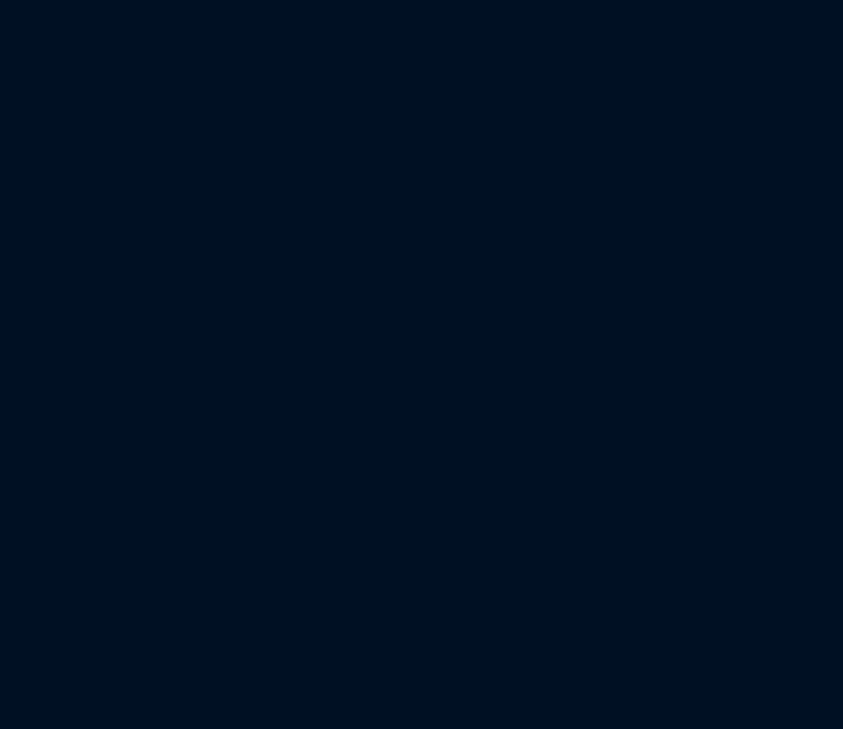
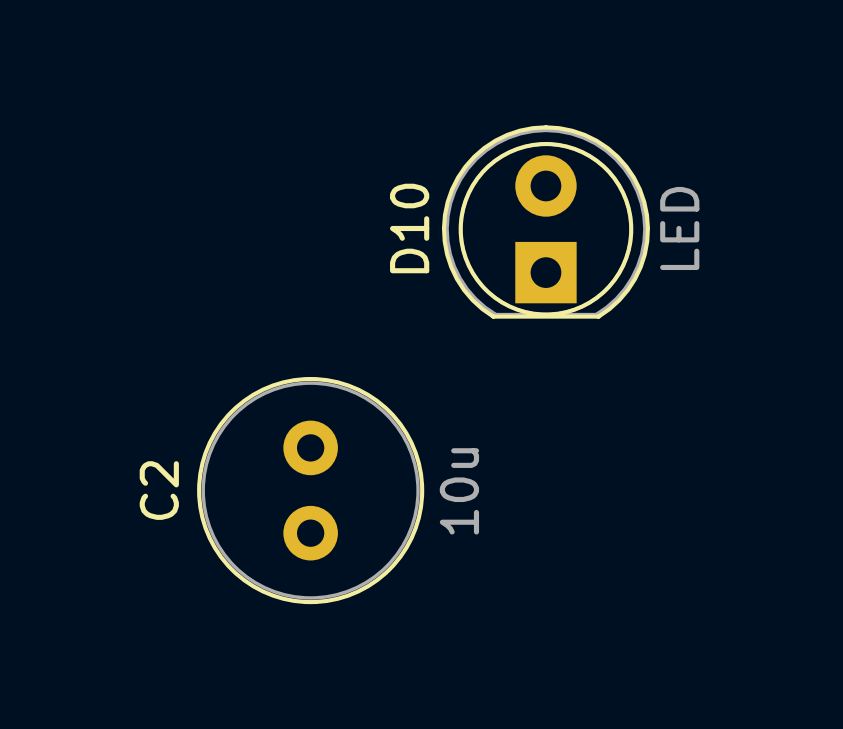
D10: none -> LED (545, 221)
C2: none -> 10u (310, 490)

